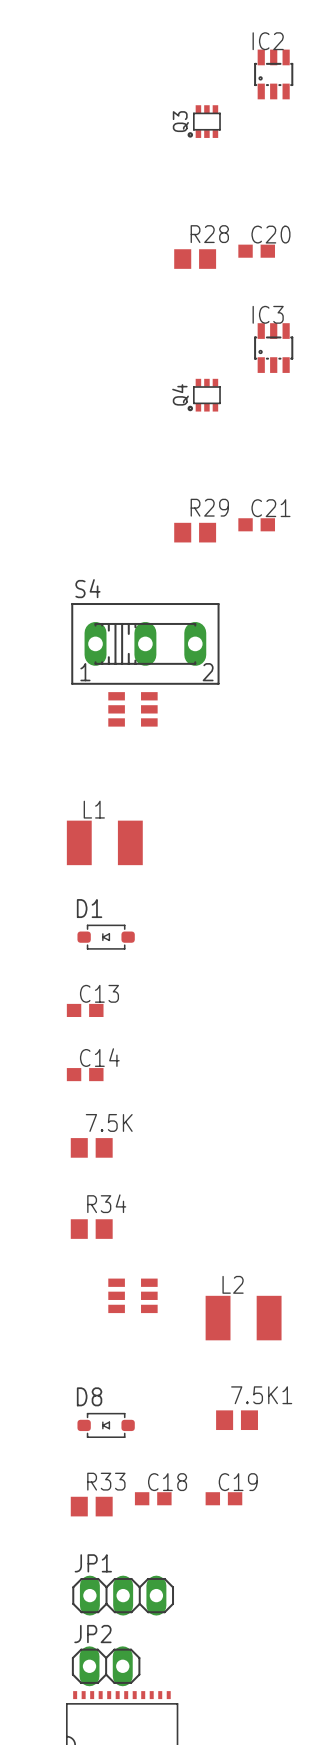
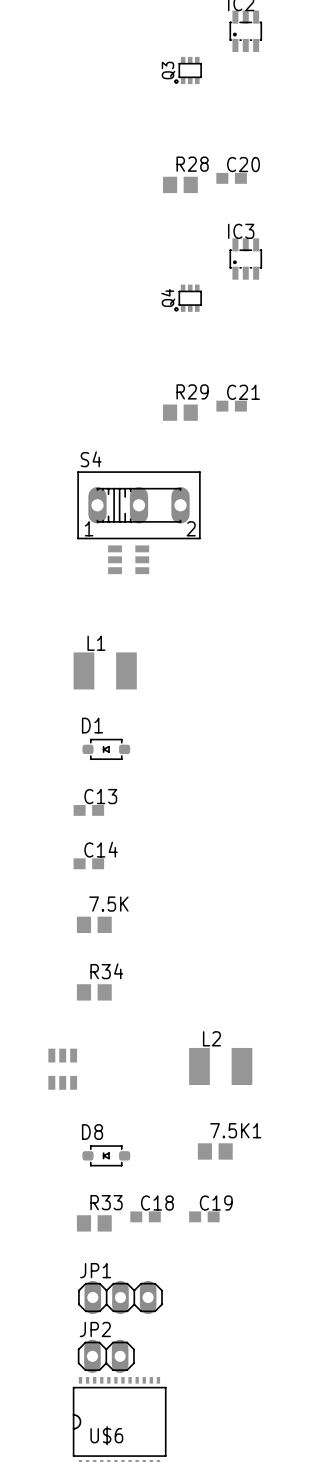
part rotation: 0° (132, 1295) -> 90° clockwise (62, 1069)
part position: (132, 1295) -> (62, 1069)

